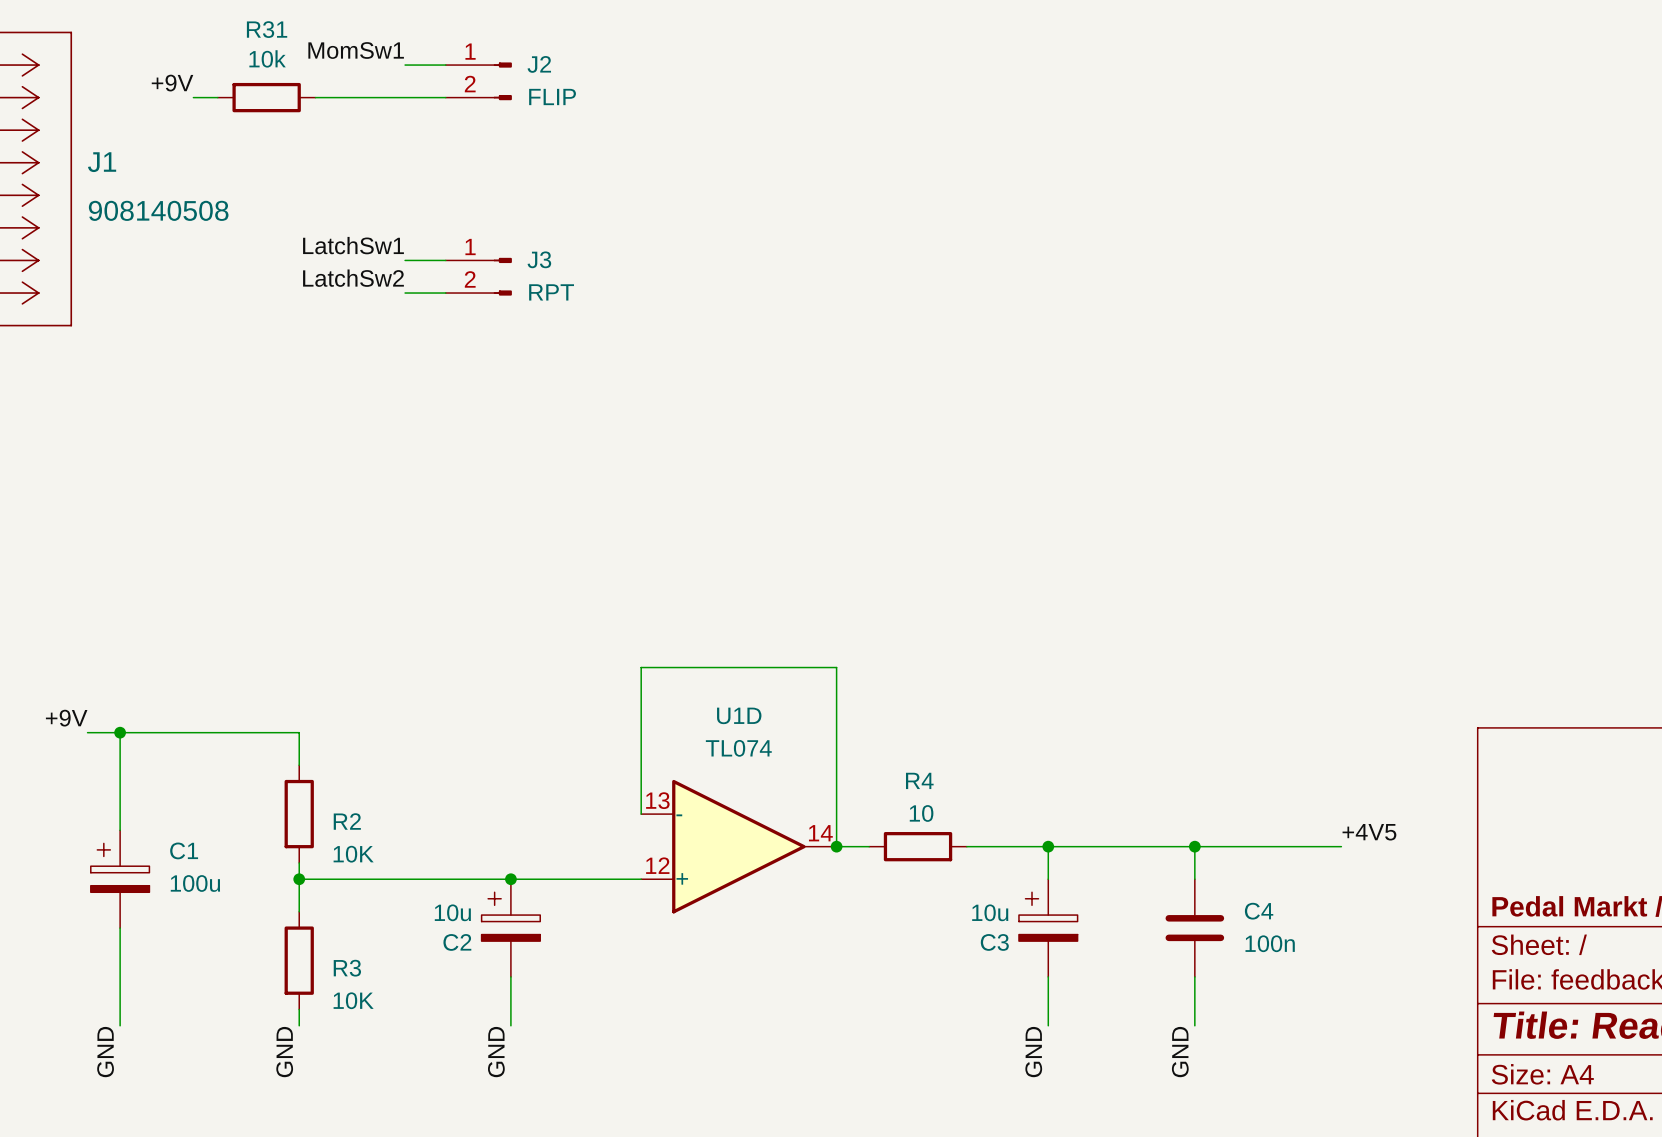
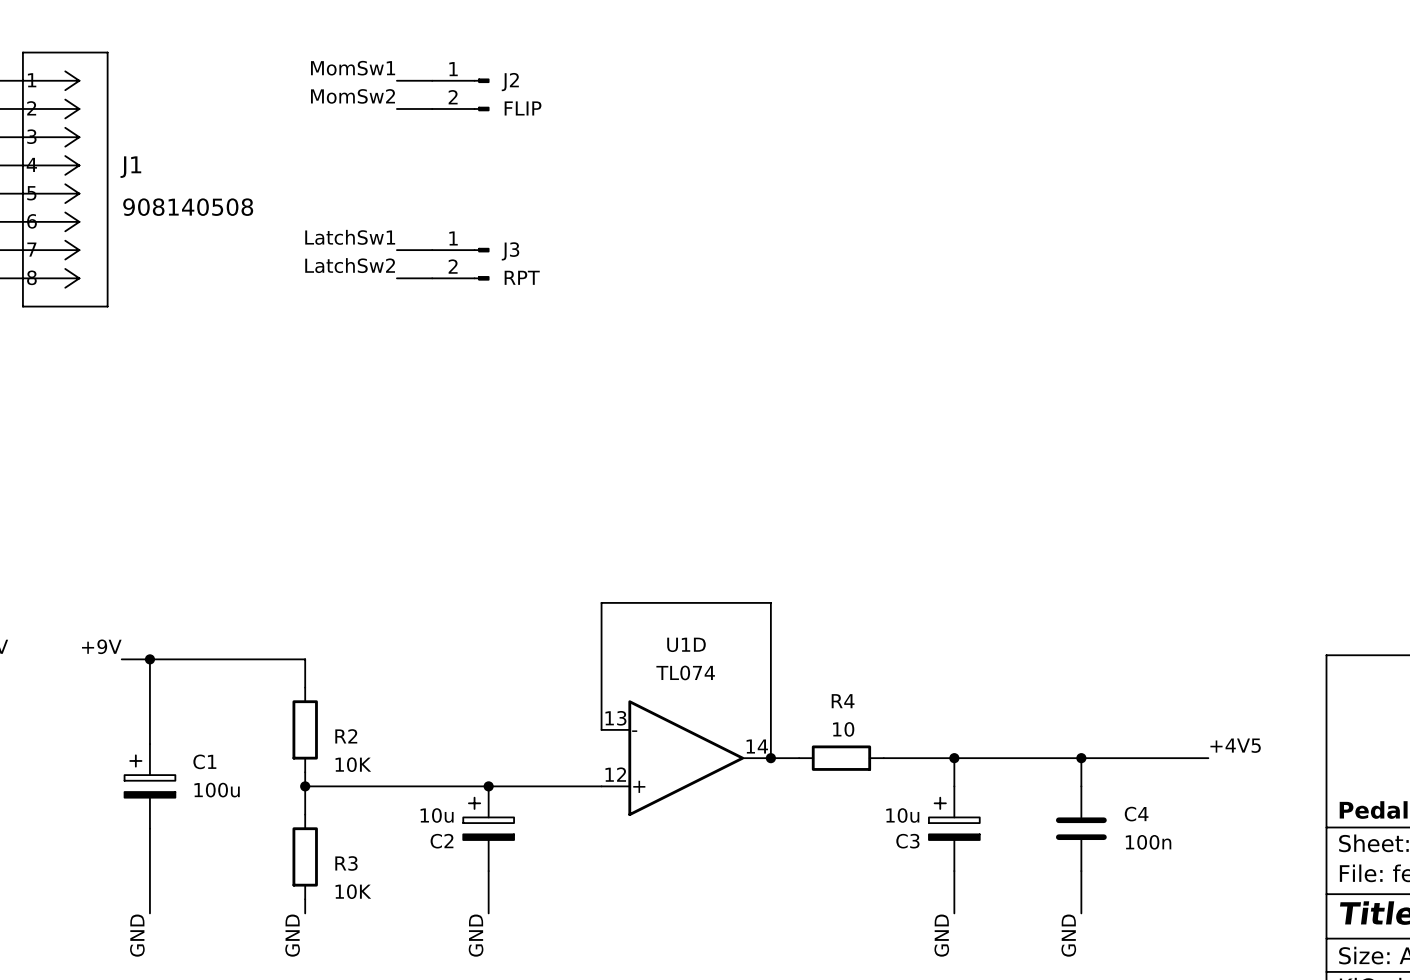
label: +9V (172, 83) -> none
label: none -> MomSw2 (352, 96)
wire: (193, 97) (217, 97) -> none
R31: 10k (266, 97) -> none
wire: (315, 97) (405, 97) -> none

